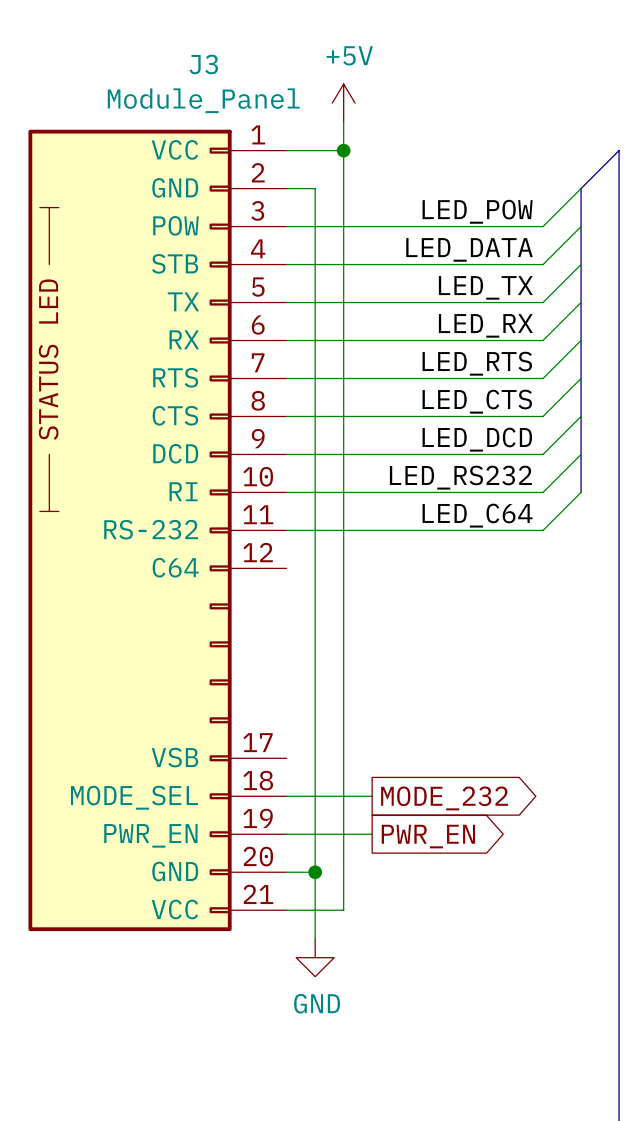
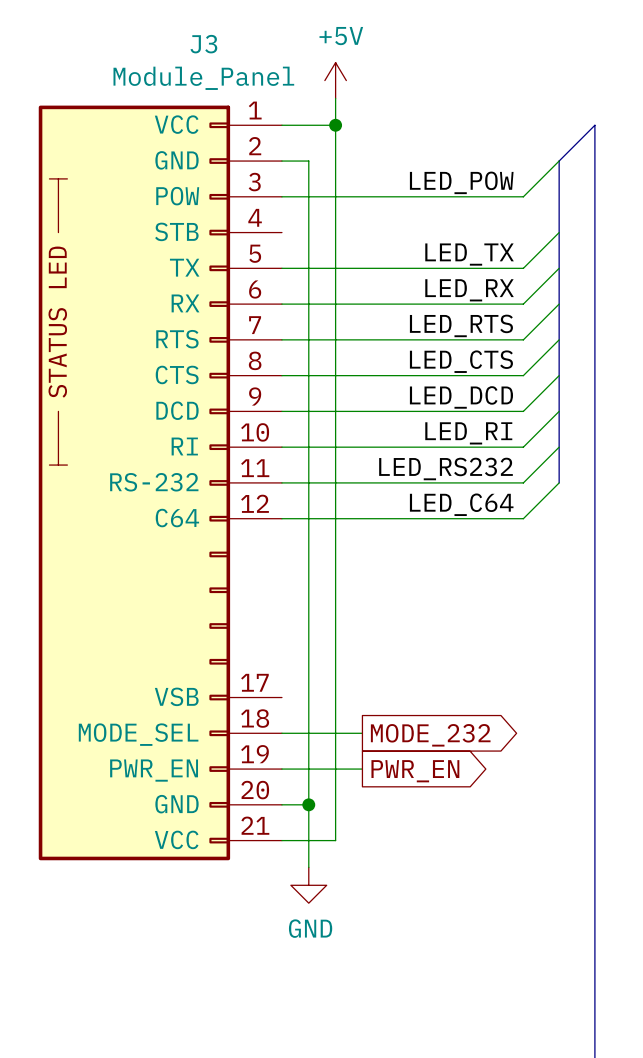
wire: (581, 226) (543, 264) (286, 264) -> (559, 482) (523, 518) (281, 518)
label: LED_DATA (469, 249) -> none
label: LED_RS232 (460, 477) -> LED_RI (468, 433)
bus: none -> (559, 447) (559, 482)
label: LED_C64 (477, 515) -> LED_RS232 (445, 468)
label: none -> LED_C64 (461, 504)

